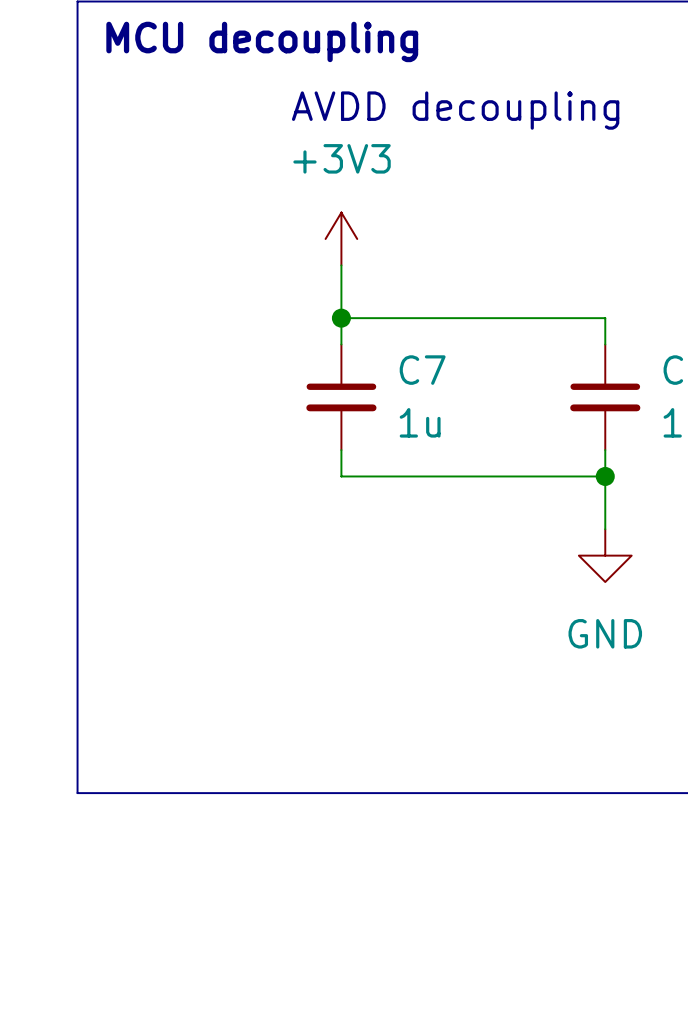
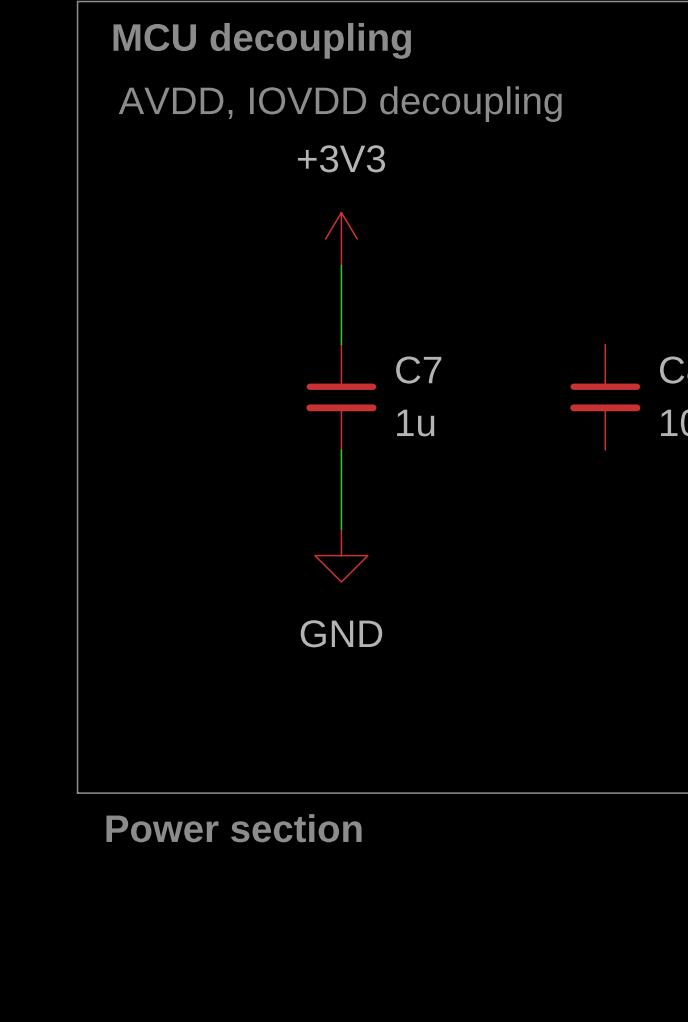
text: AVDD decoupling (455, 110) -> AVDD, IOVDD decoupling (340, 104)
wire: (341, 318) (605, 318) (605, 344) -> none
junction: (341, 318) -> none
wire: (605, 450) (605, 529) -> none
wire: (341, 476) (605, 476) -> (341, 476) (341, 529)
junction: (605, 476) -> none
power symbol position: GND (605, 555) -> GND (341, 555)
text: none -> Power section (234, 828)

